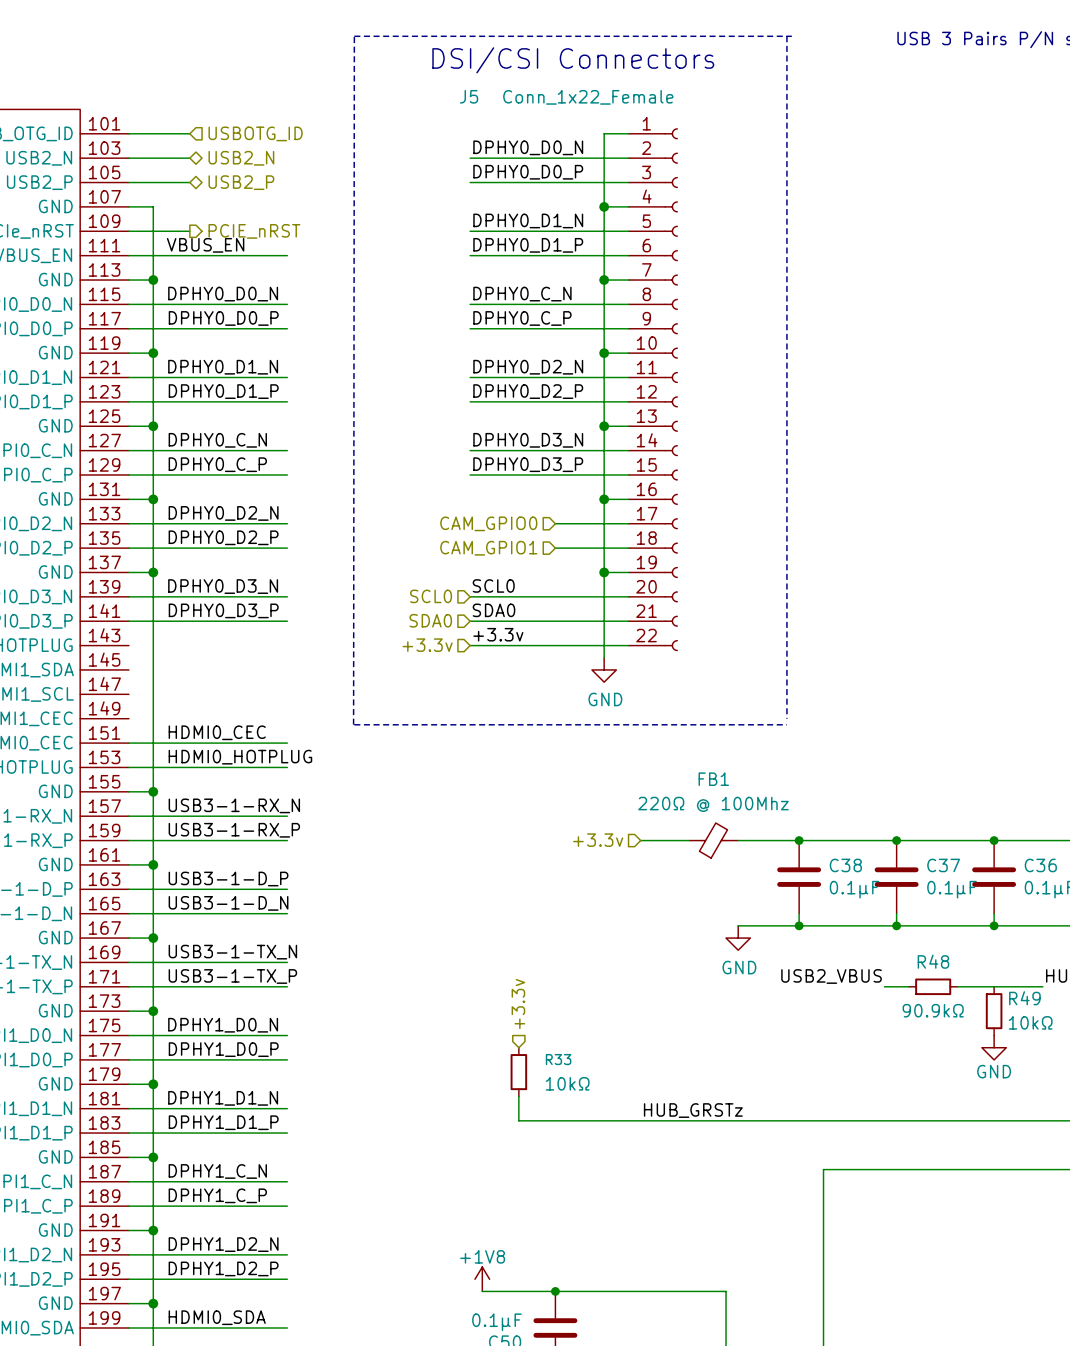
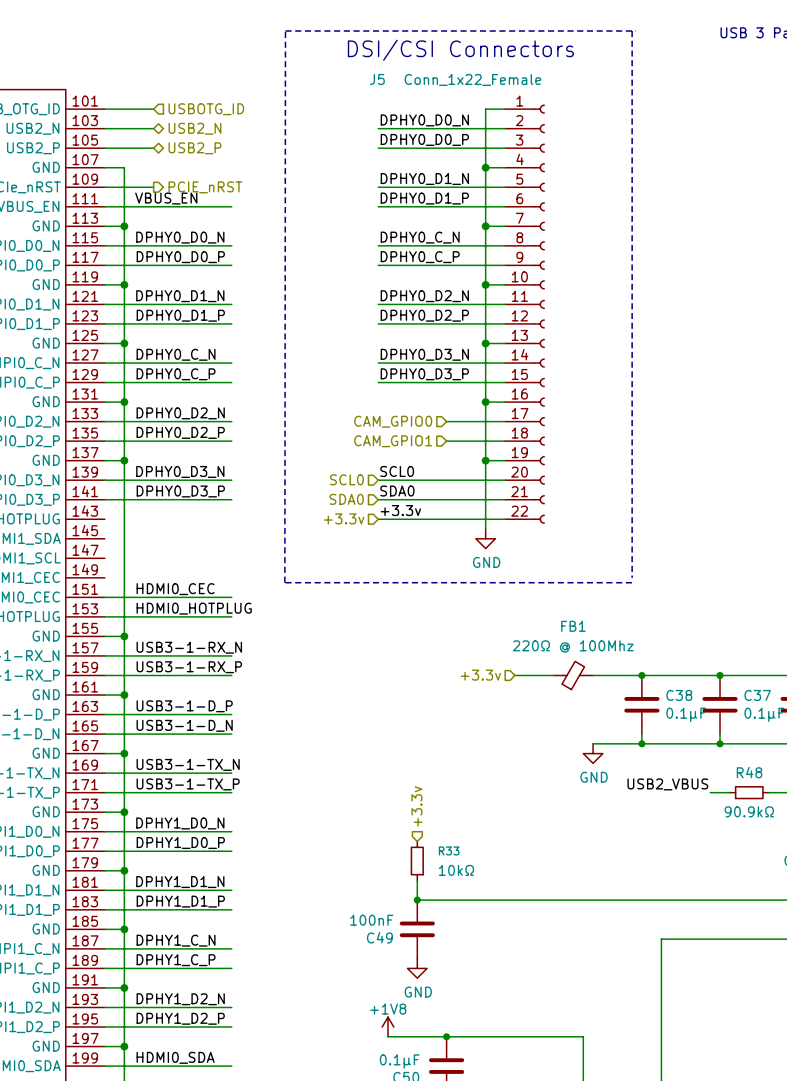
label: HUB_GRSTz (693, 1110) -> none
junction: none -> (417, 900)
C49: none -> 100nF (417, 929)
power symbol: none -> GND (417, 968)

